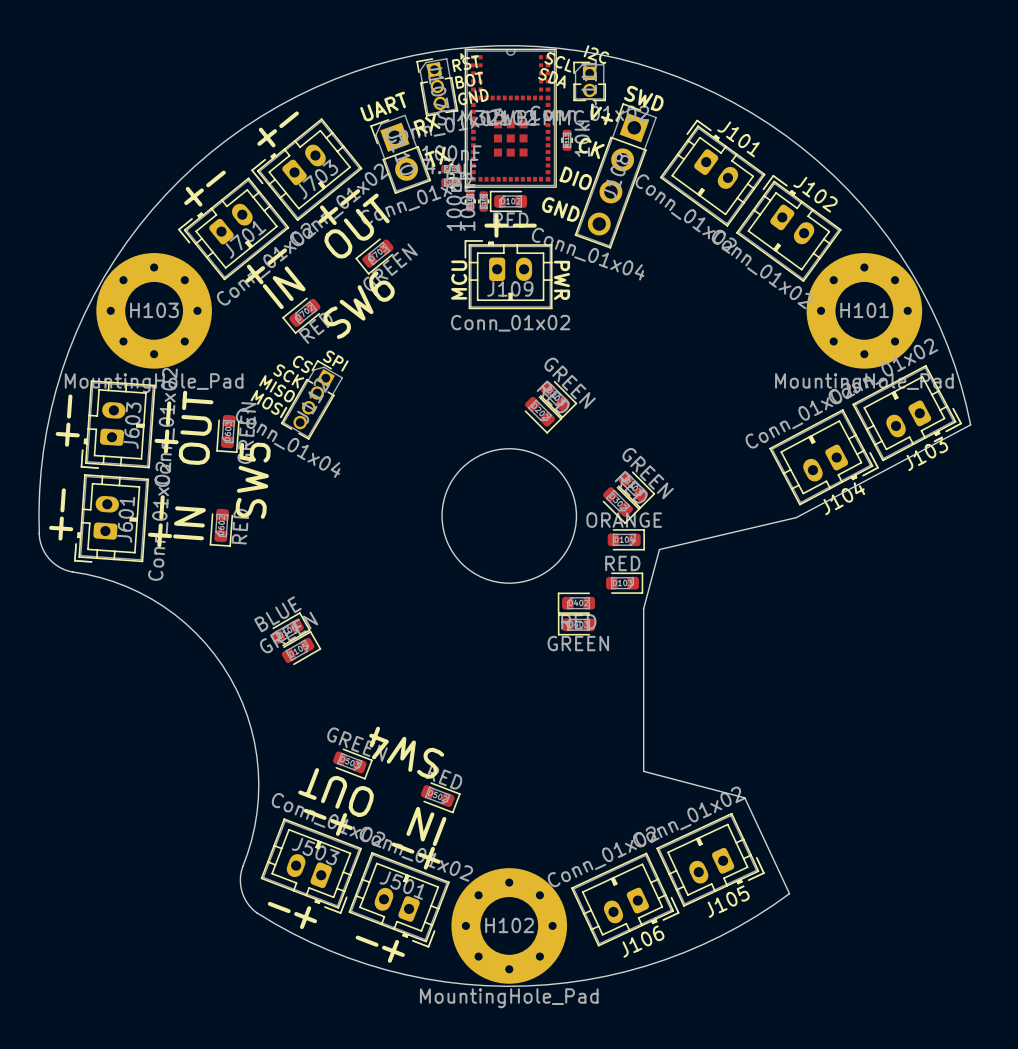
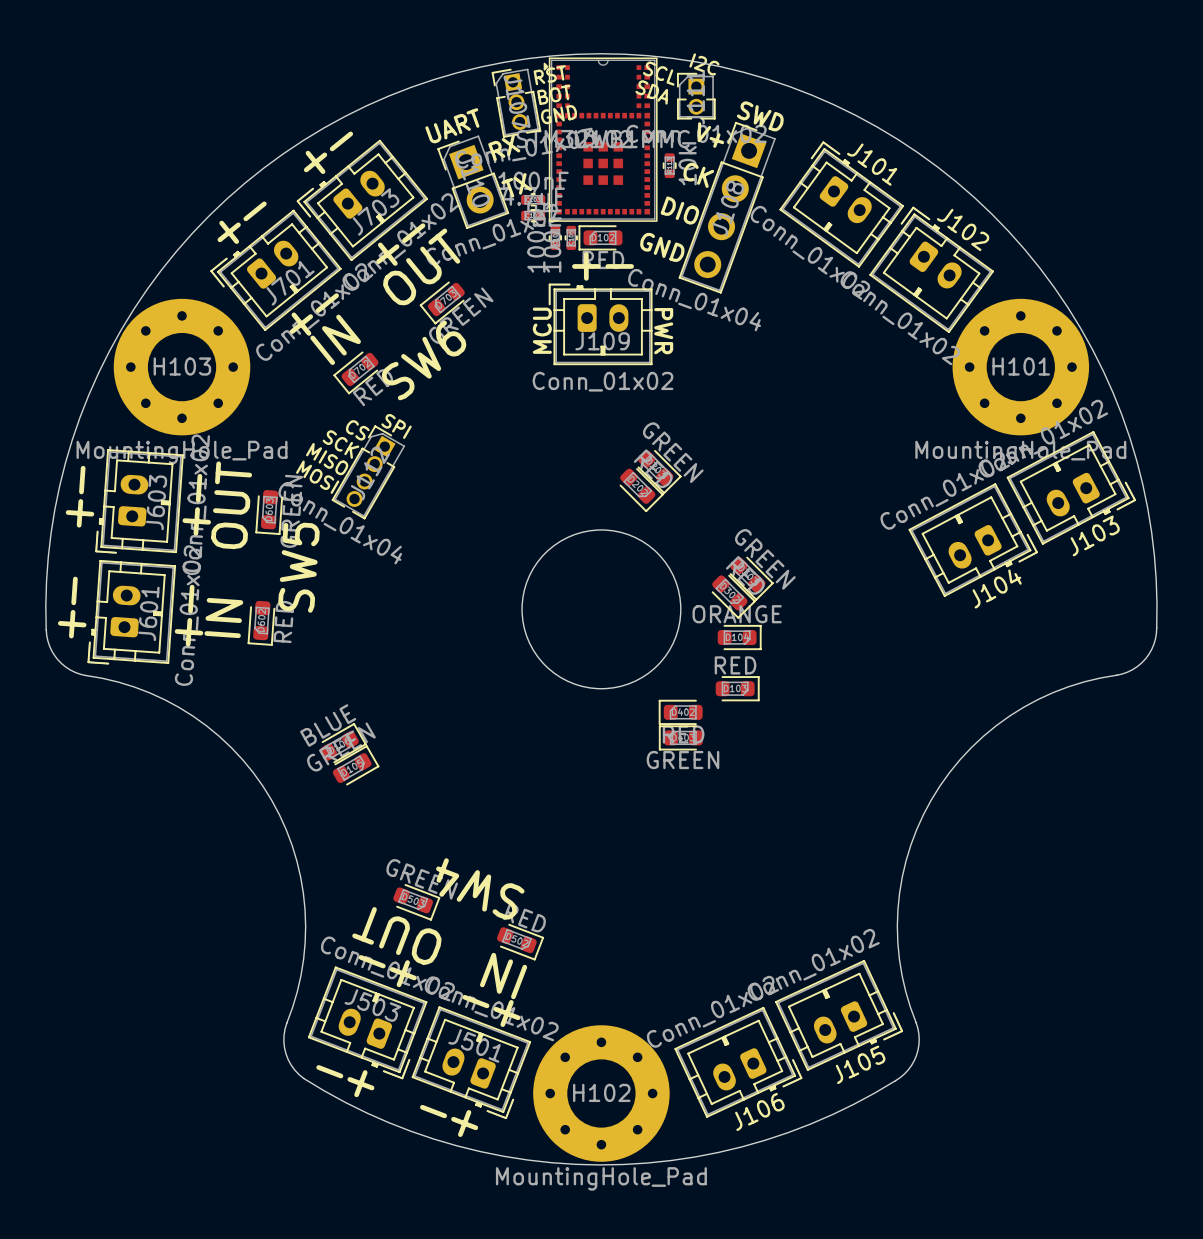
board edge: (39, 533) (39, 492) (43, 451) (50, 410) (61, 370) (84, 313) (104, 276) (126, 242) (152, 209) (180, 179) (227, 139) (261, 116) (297, 96) (335, 79) (374, 65) (414, 55) (454, 48) (495, 45) (537, 46) (578, 50) (618, 58) (658, 69) (696, 84) (734, 102) (769, 124) (802, 148) (833, 175) (862, 205) (888, 237) (921, 289) (939, 326) (954, 365) (970, 424) (796, 517) (659, 549) (643, 608) (643, 771) (744, 797) (789, 893) (738, 926) (702, 944) (664, 959) (626, 971) (586, 979) (526, 985) (465, 984) (425, 978) (386, 969) (347, 957) (310, 942) (257, 913) -> (46, 629) (46, 581) (50, 533) (59, 486) (72, 439) (89, 394) (109, 350) (147, 289) (176, 251) (209, 215) (245, 183) (283, 153) (324, 127) (366, 105) (411, 87) (457, 72) (528, 58) (576, 54) (624, 54) (672, 58) (720, 66) (766, 78) (812, 95) (855, 115) (897, 139) (956, 181) (991, 214) (1024, 249) (1054, 287) (1080, 328) (1113, 392) (1129, 437) (1142, 484) (1154, 555) (1156, 603) (1155, 639) (1145, 658) (1132, 669) (1122, 673) (1068, 686) (1038, 699) (1009, 716) (983, 736) (960, 759) (931, 799) (910, 844) (902, 876) (897, 909) (897, 942) (902, 975) (917, 1028) (919, 1039) (916, 1055) (904, 1074) (874, 1092) (832, 1114) (764, 1140) (694, 1157) (647, 1163) (599, 1164) (527, 1160) (480, 1151) (433, 1139) (366, 1113) (303, 1078)

